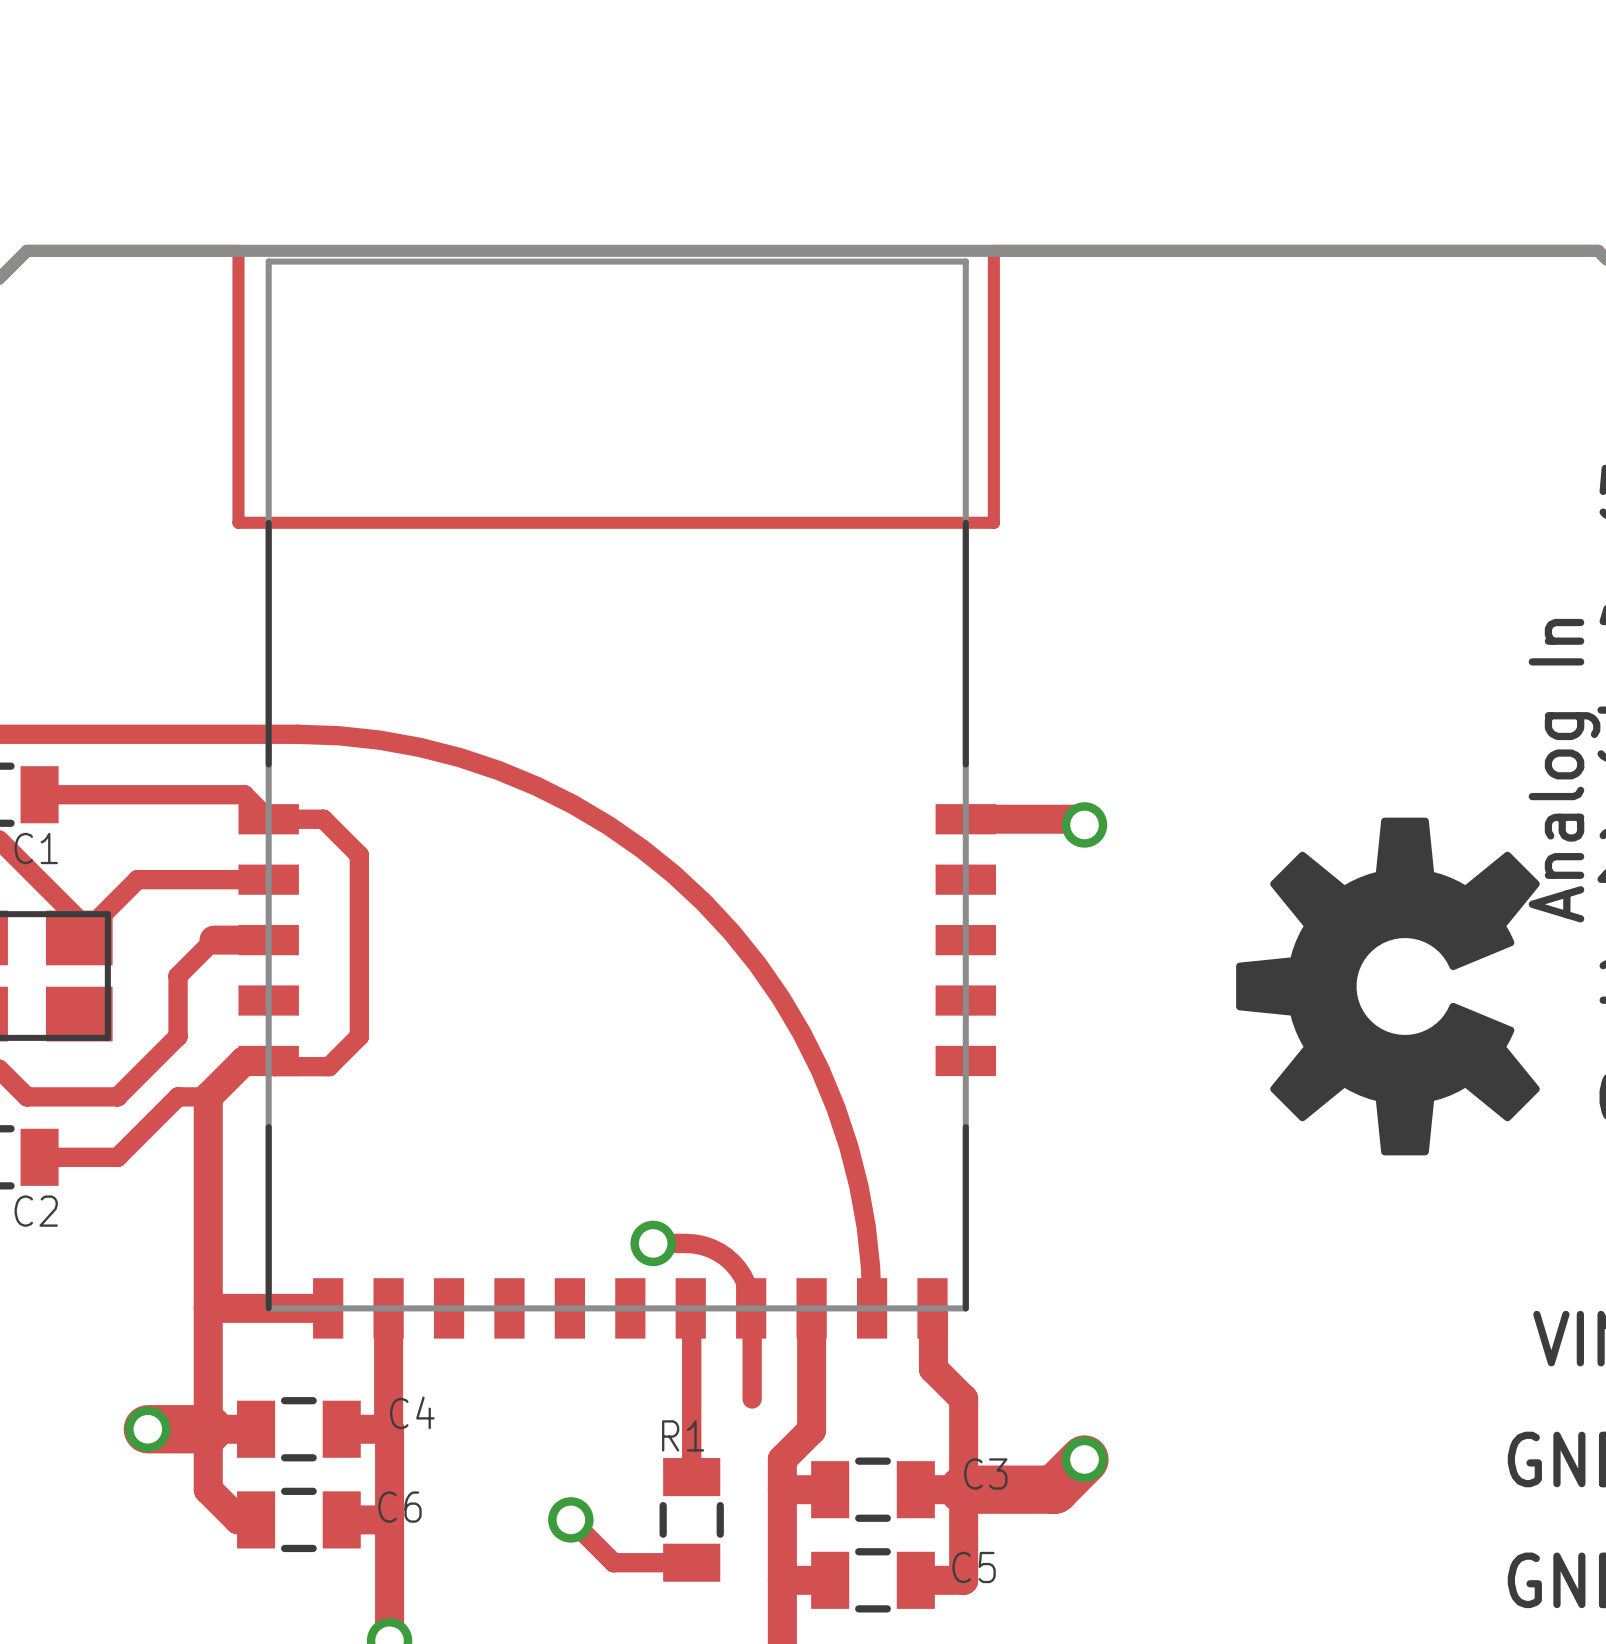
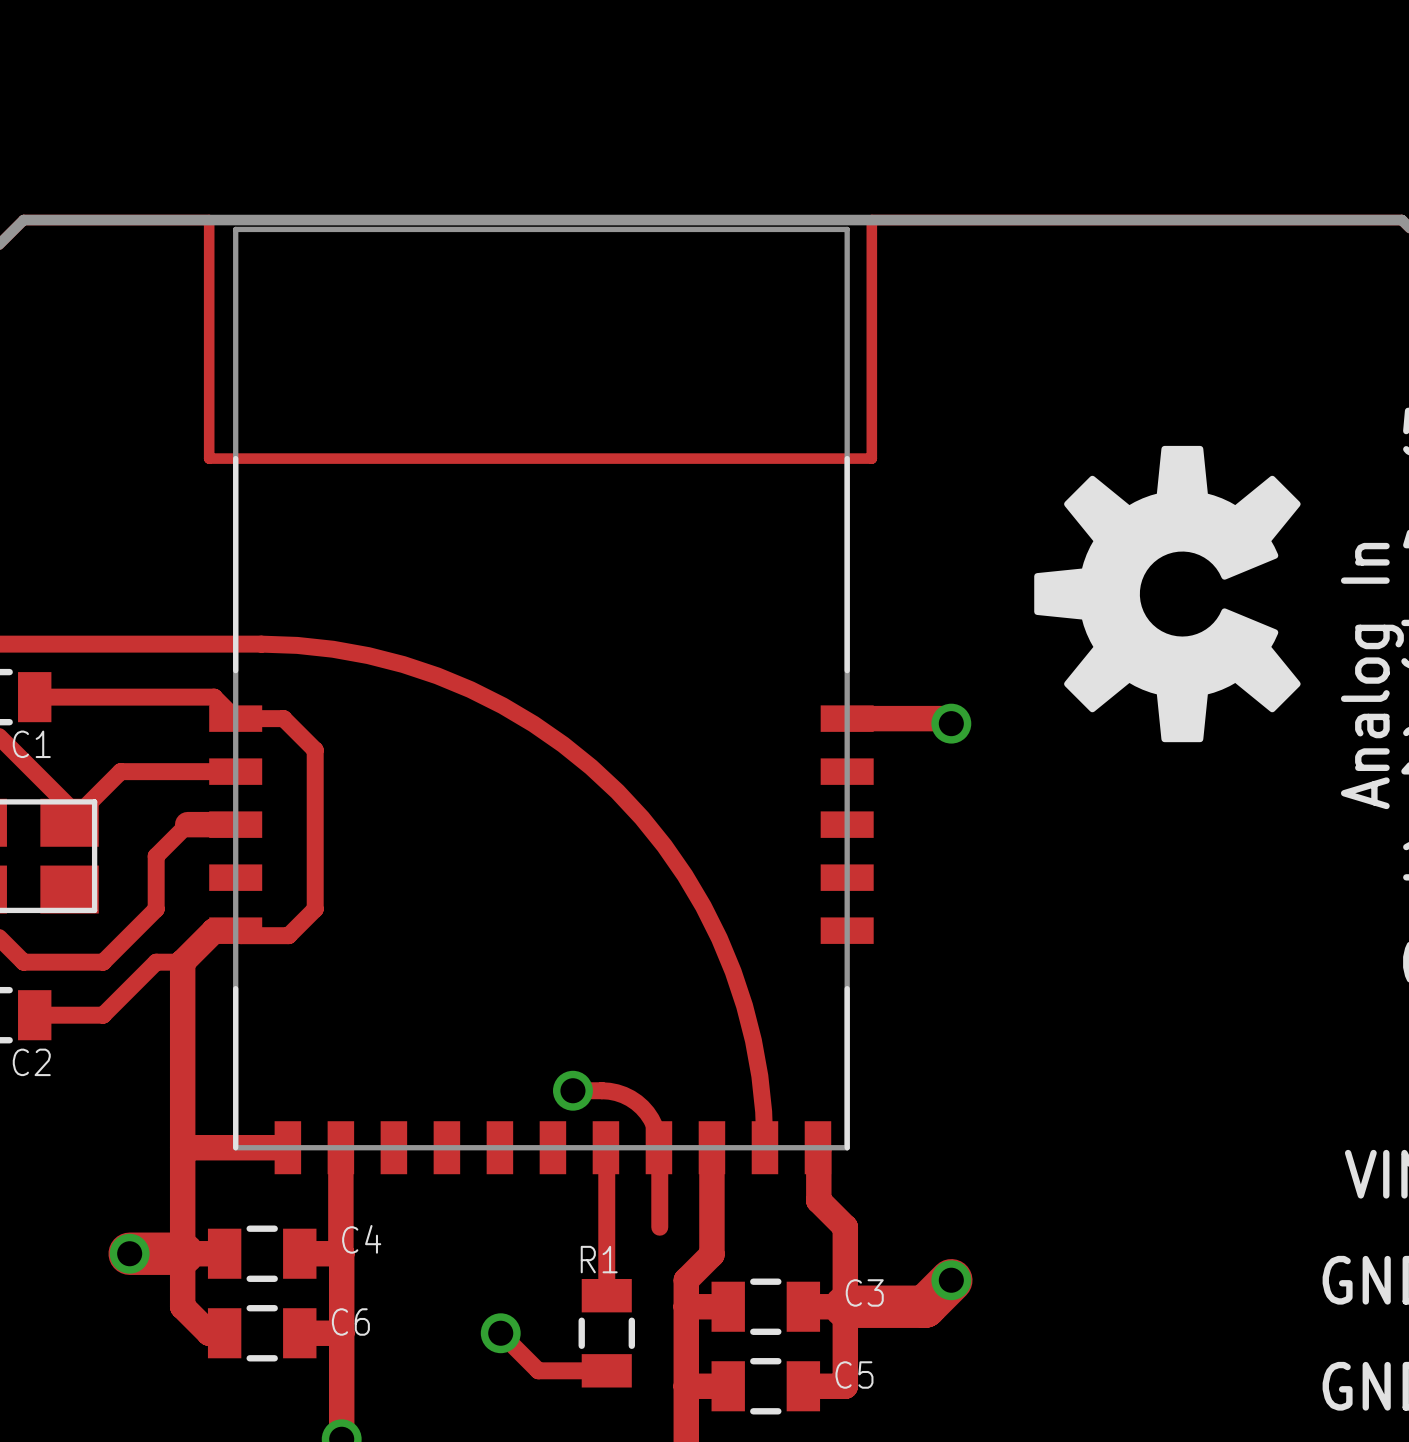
drawing position: (1387, 986) -> (1167, 594)

